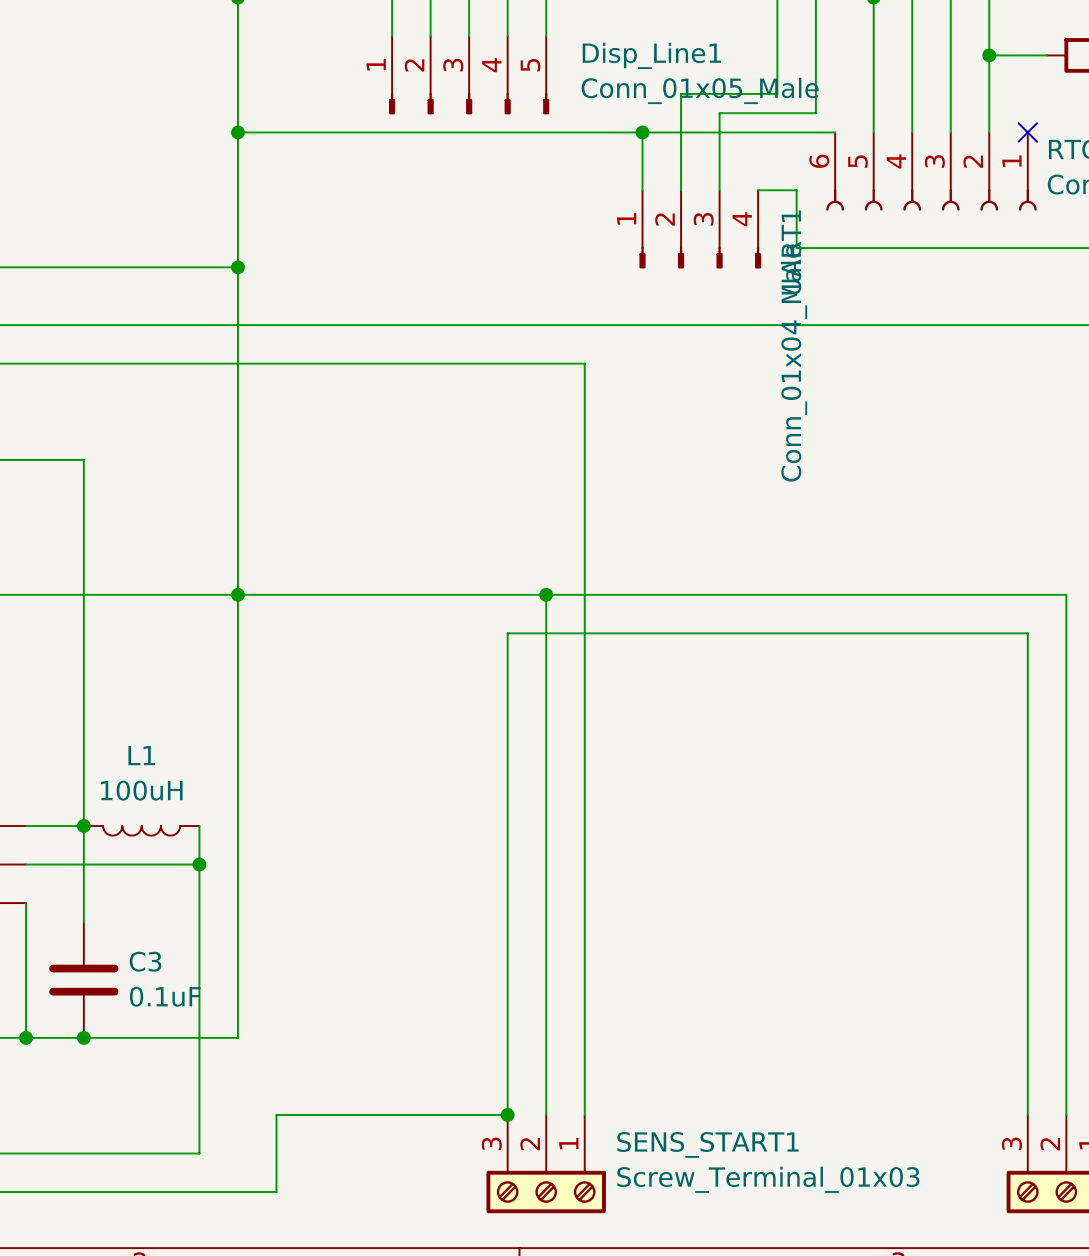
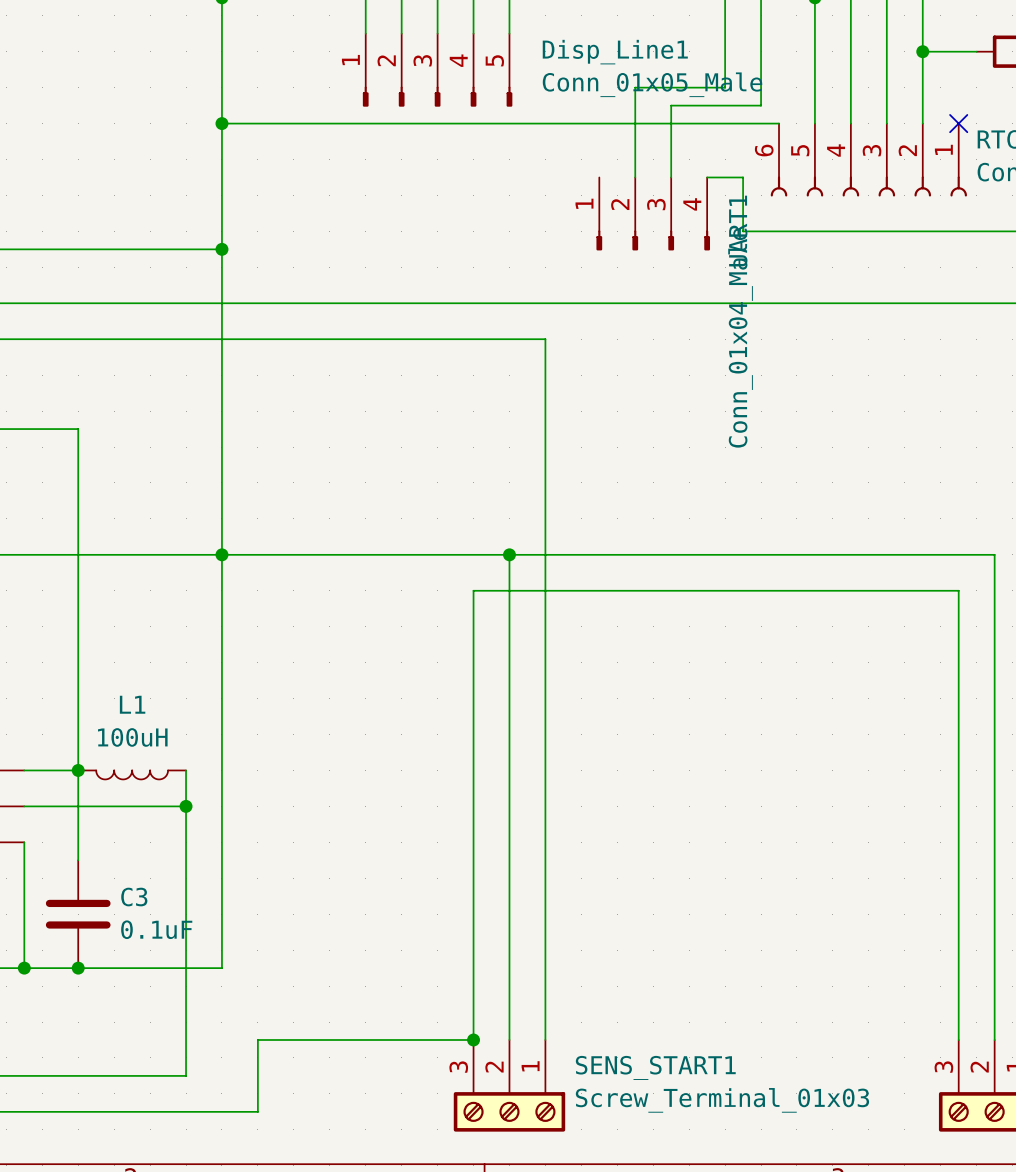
wire: (642, 132) (642, 190) -> none
junction: (642, 132) -> none

